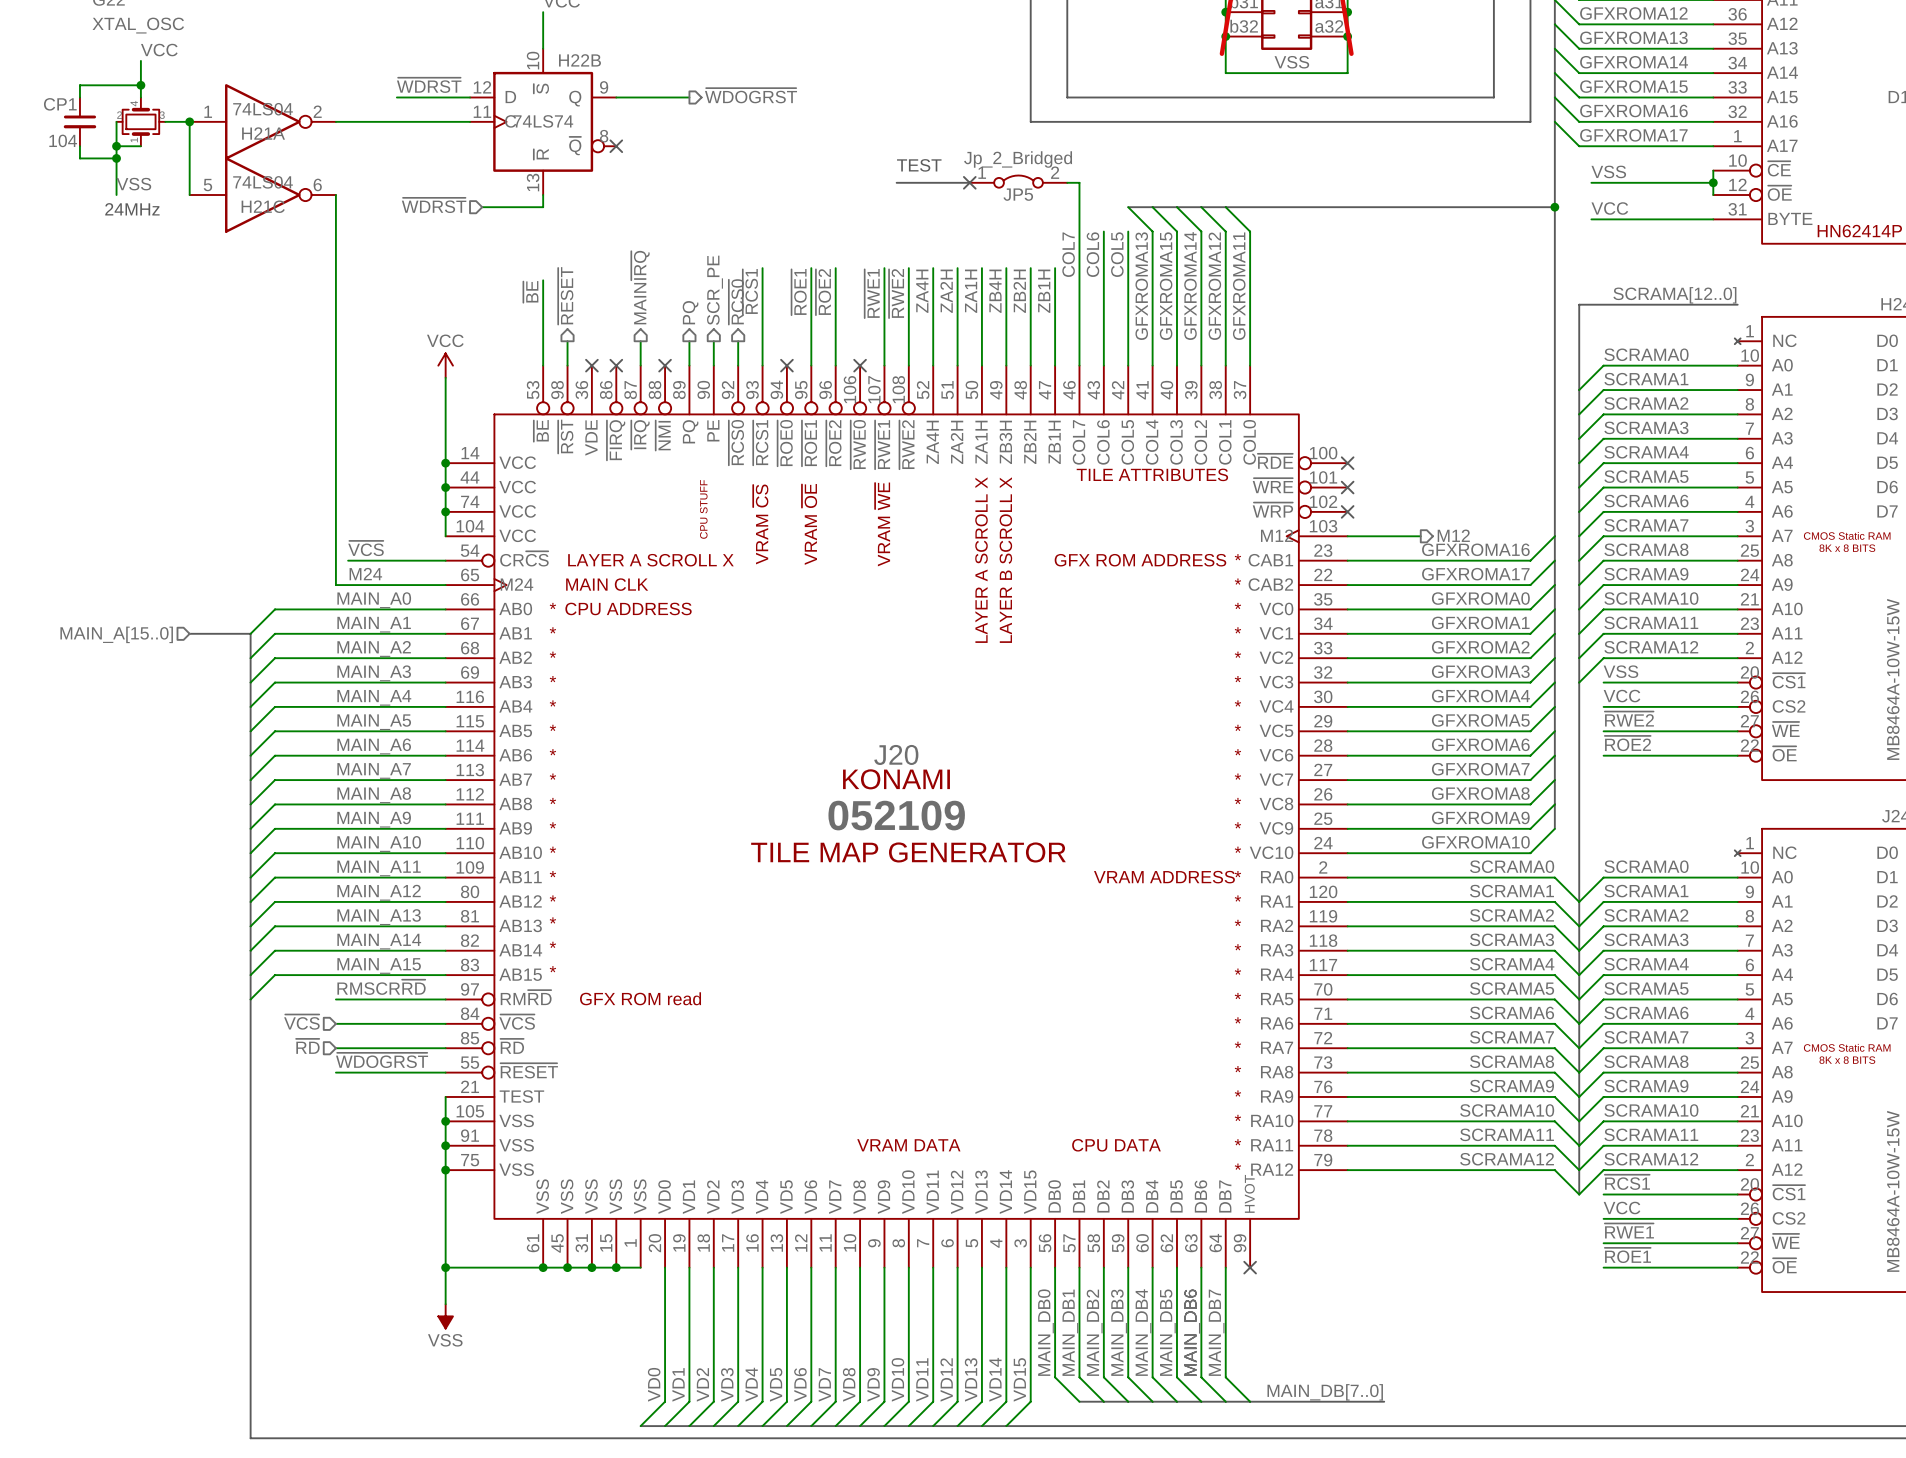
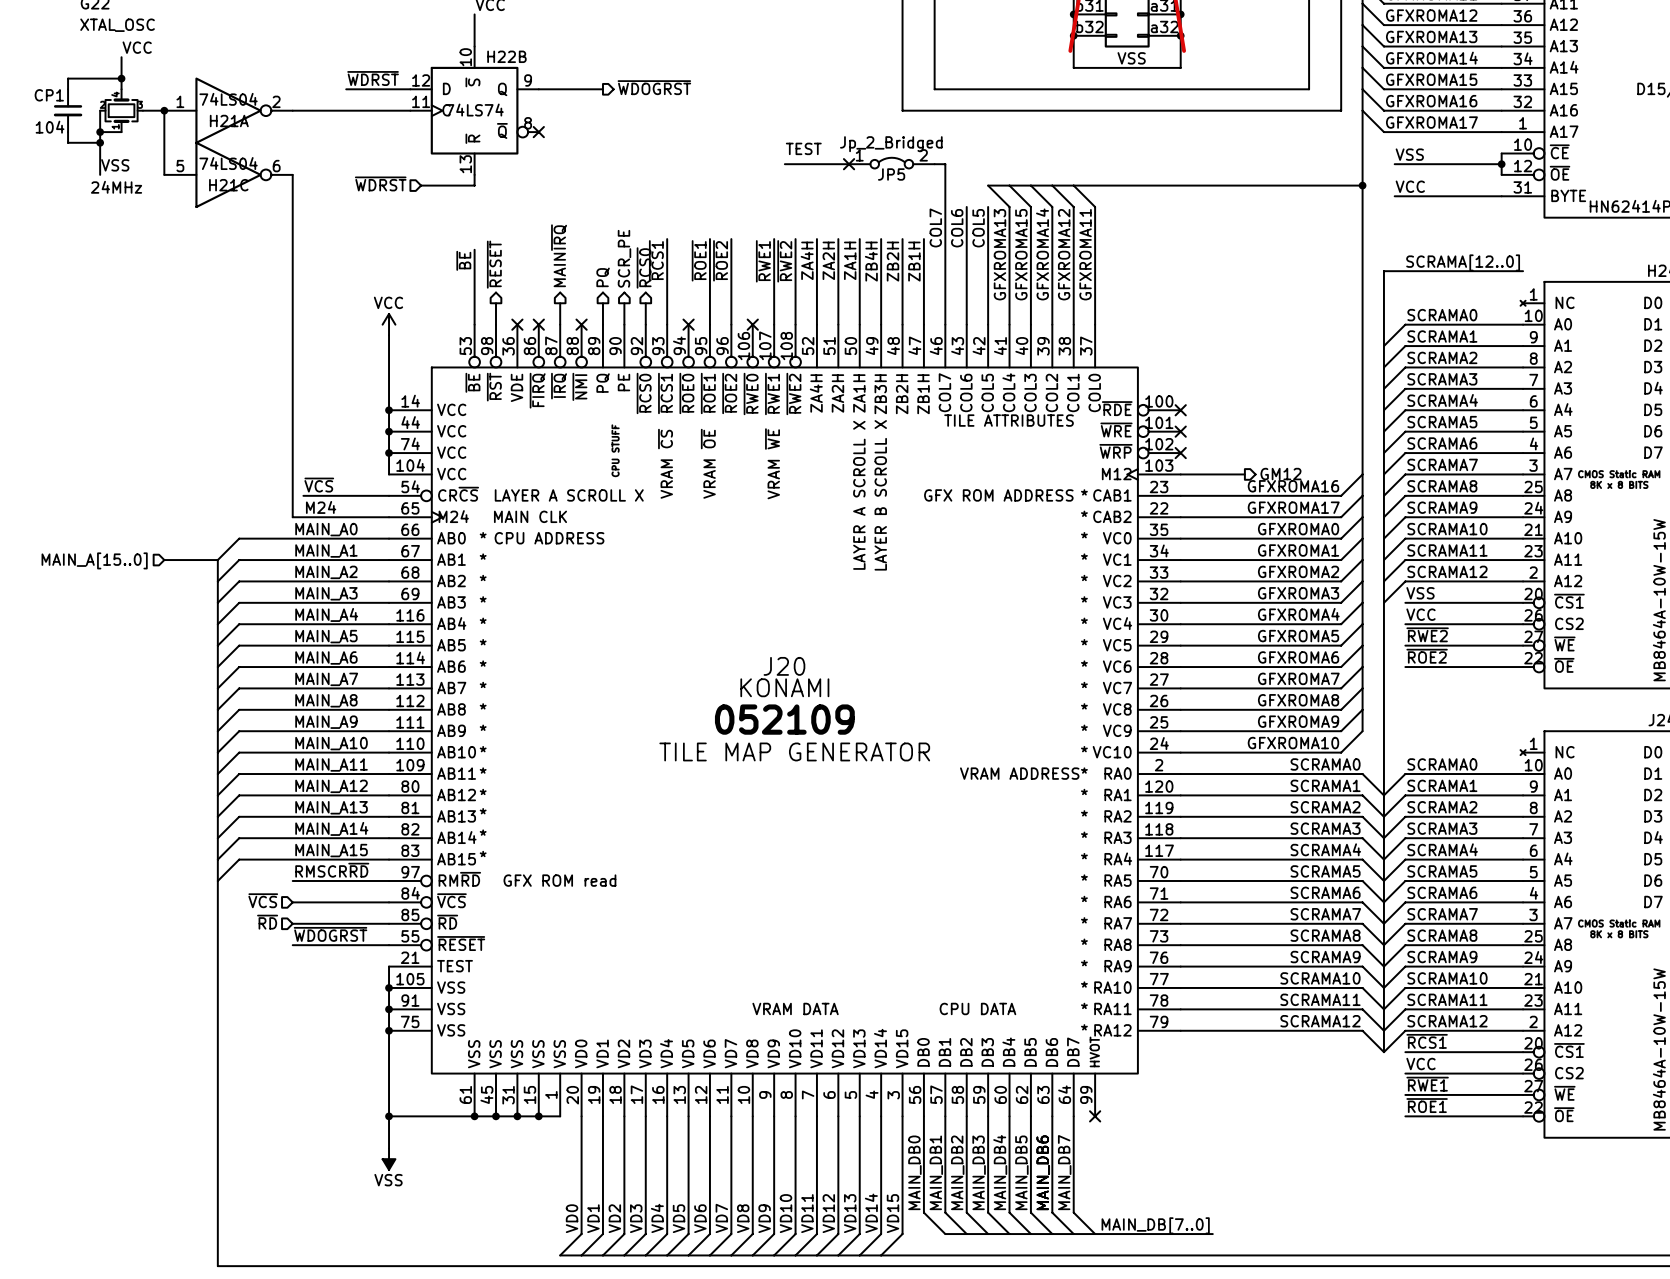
hierarchical label: M12 (1453, 535) -> GM12 (1280, 474)

